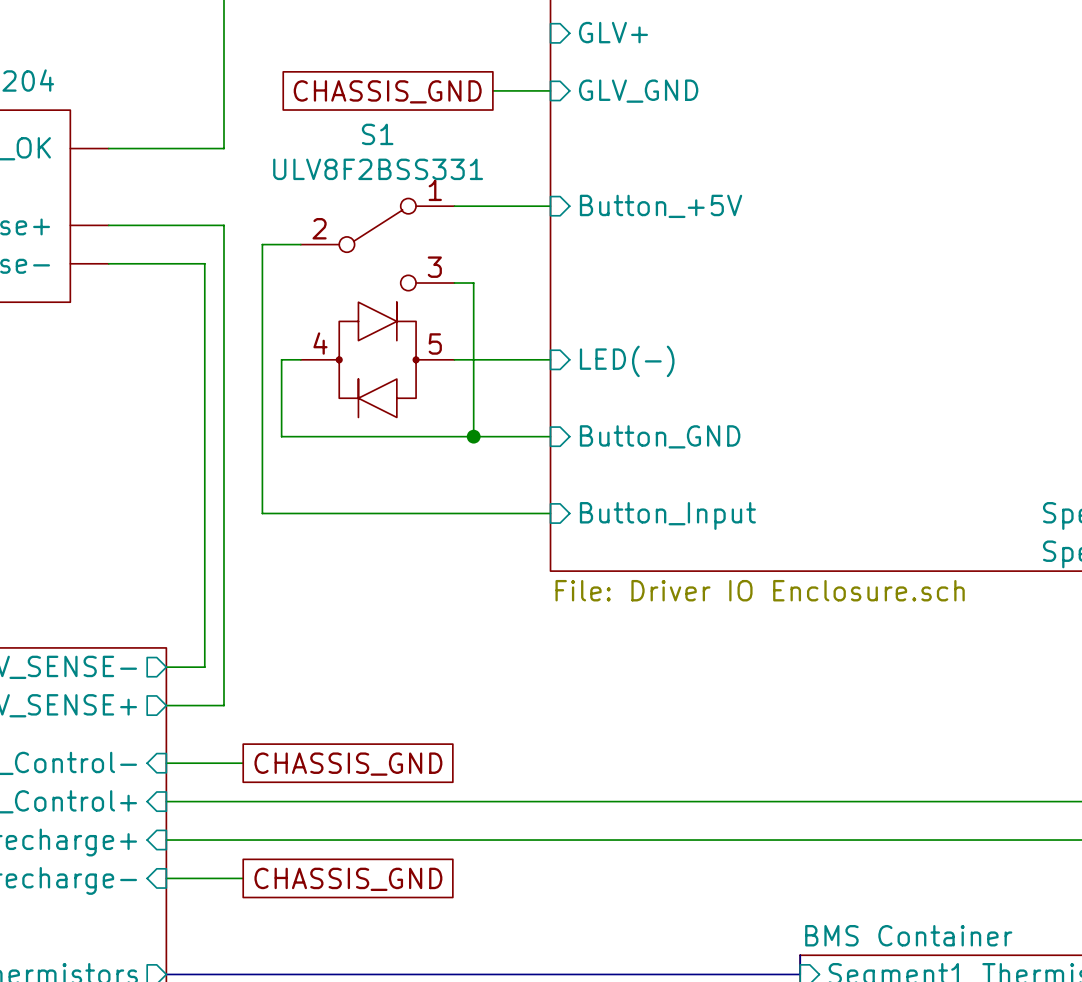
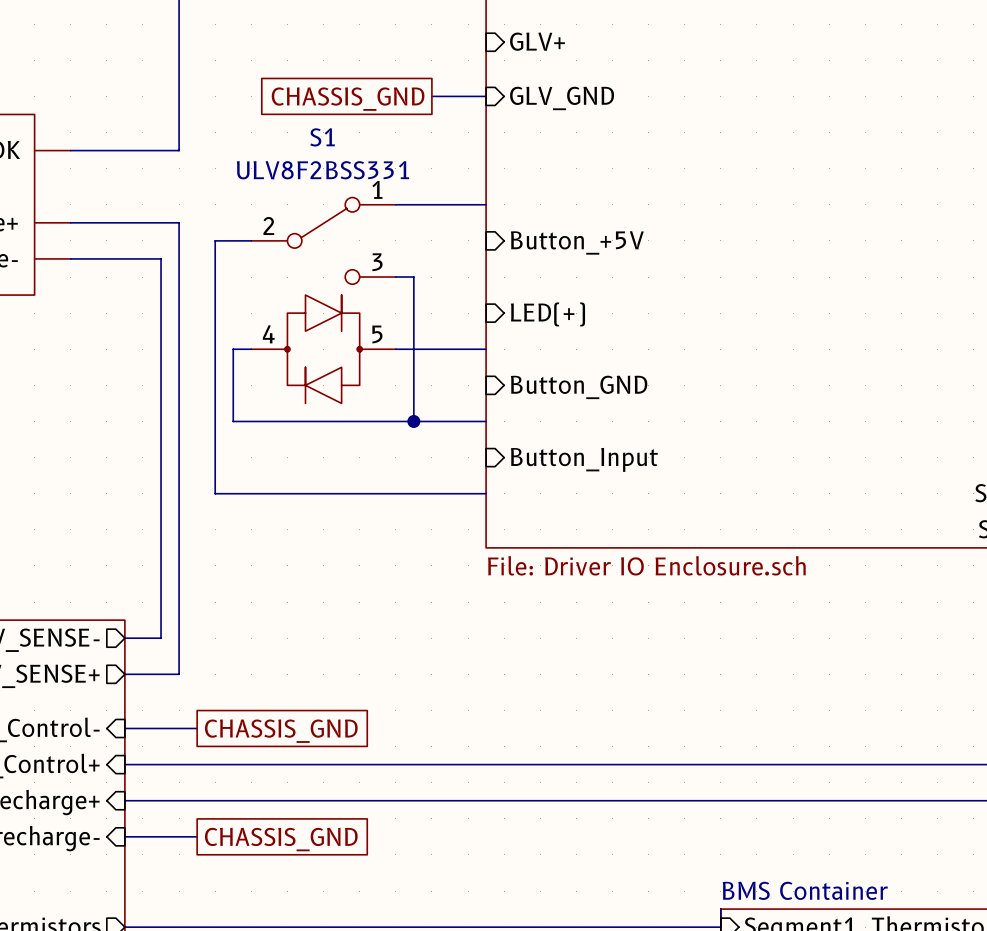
sheet pin position: Button_+5V (661, 206) -> Button_+5V (577, 242)
sheet pin: LED(-) (627, 361) -> LED(+) (547, 314)
sheet pin position: Button_GND (660, 436) -> Button_GND (579, 387)
sheet pin position: Button_Input (667, 515) -> Button_Input (584, 459)

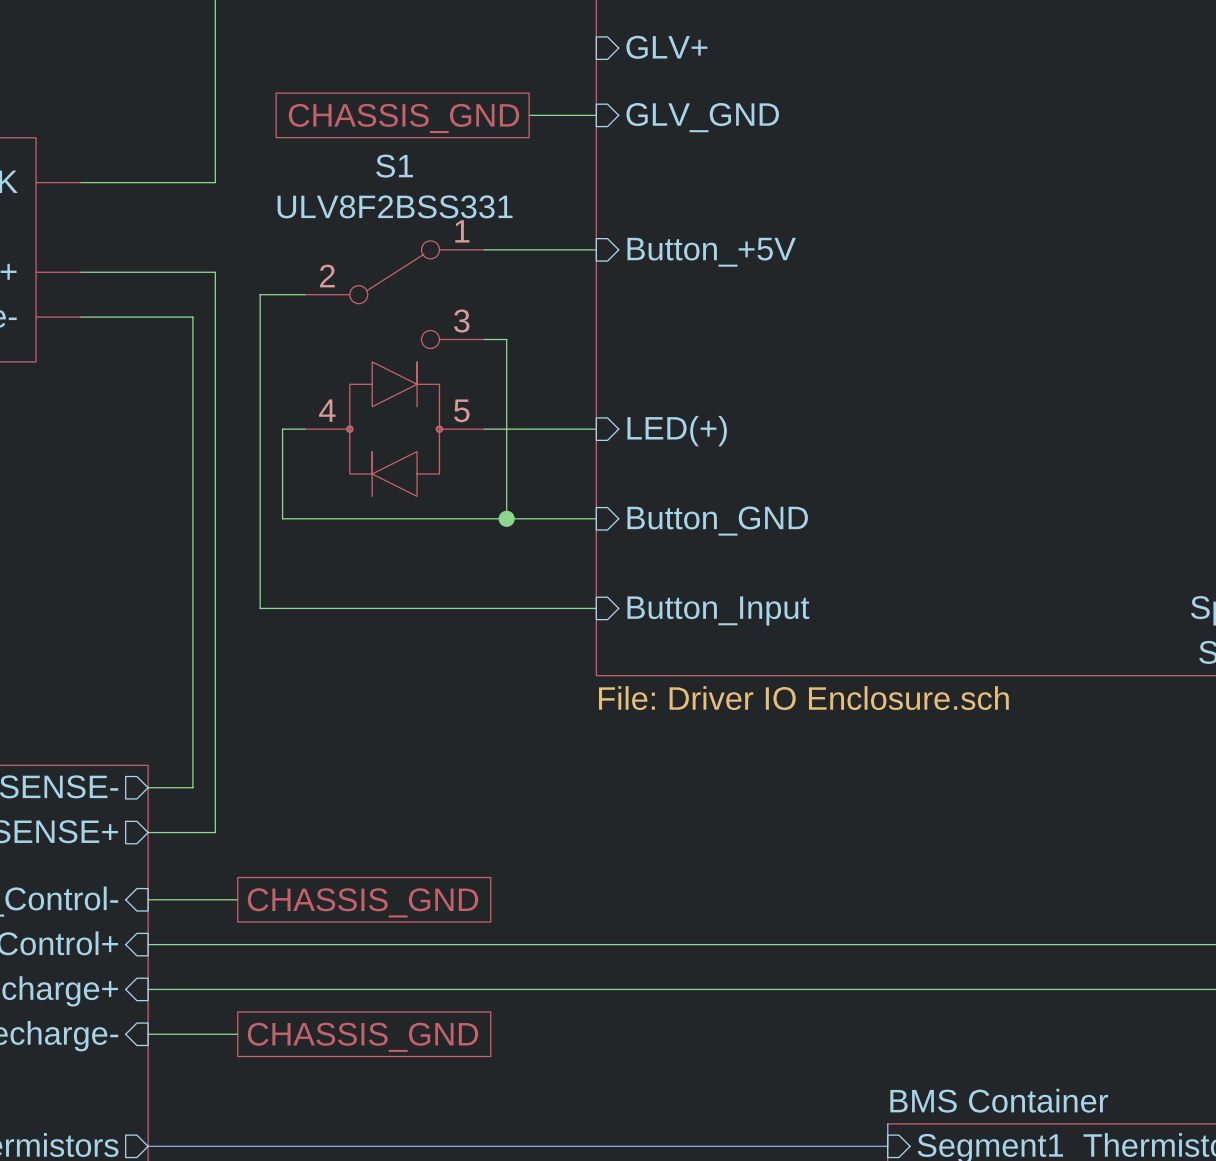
sheet pin position: Button_+5V (577, 242) -> Button_+5V (711, 252)
sheet pin position: LED(+) (547, 314) -> LED(+) (677, 431)
sheet pin position: Button_GND (579, 387) -> Button_GND (717, 521)
sheet pin position: Button_Input (584, 459) -> Button_Input (718, 610)

